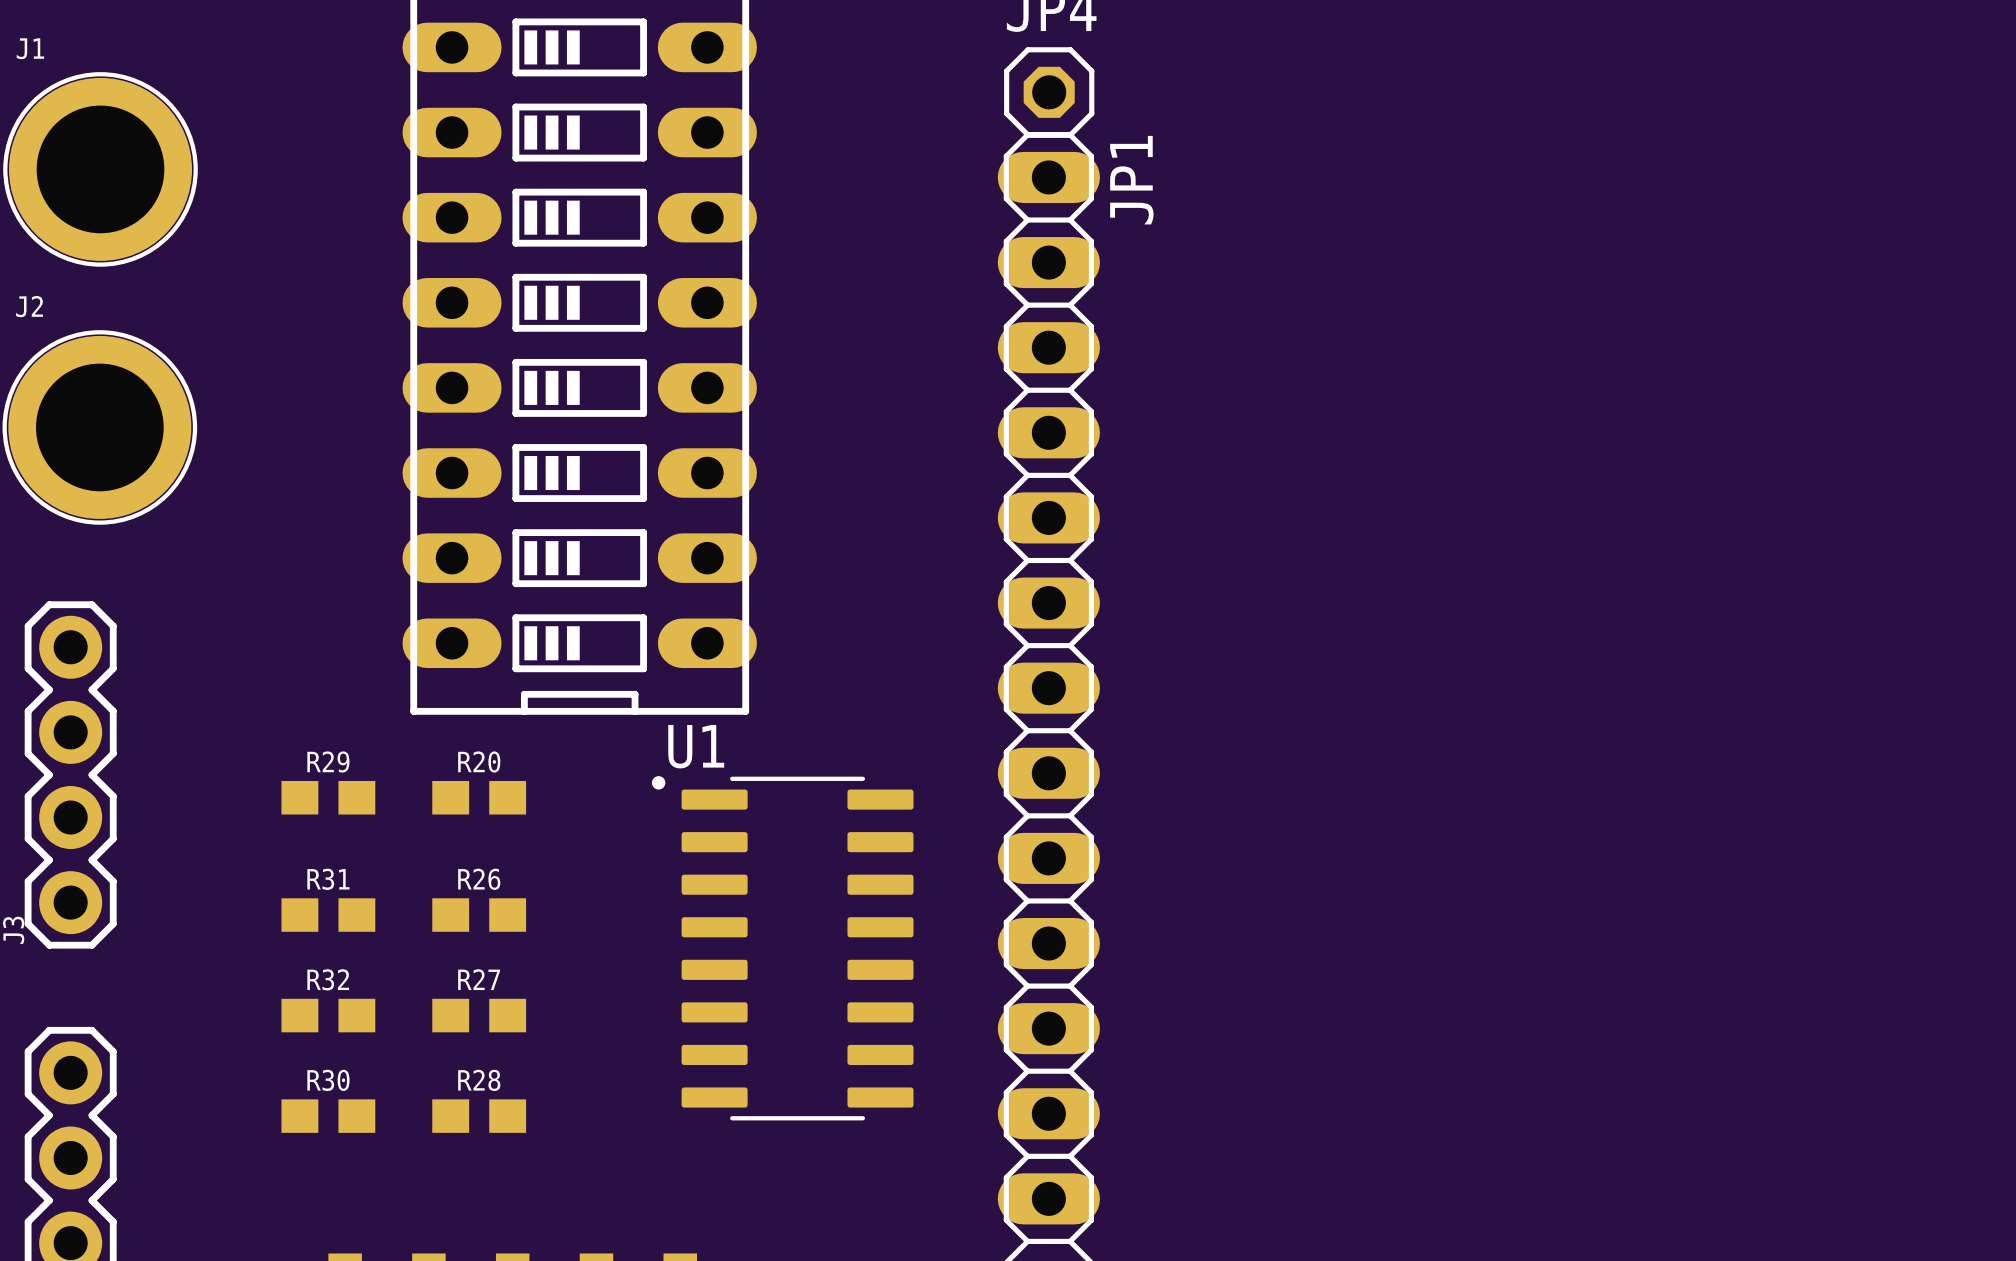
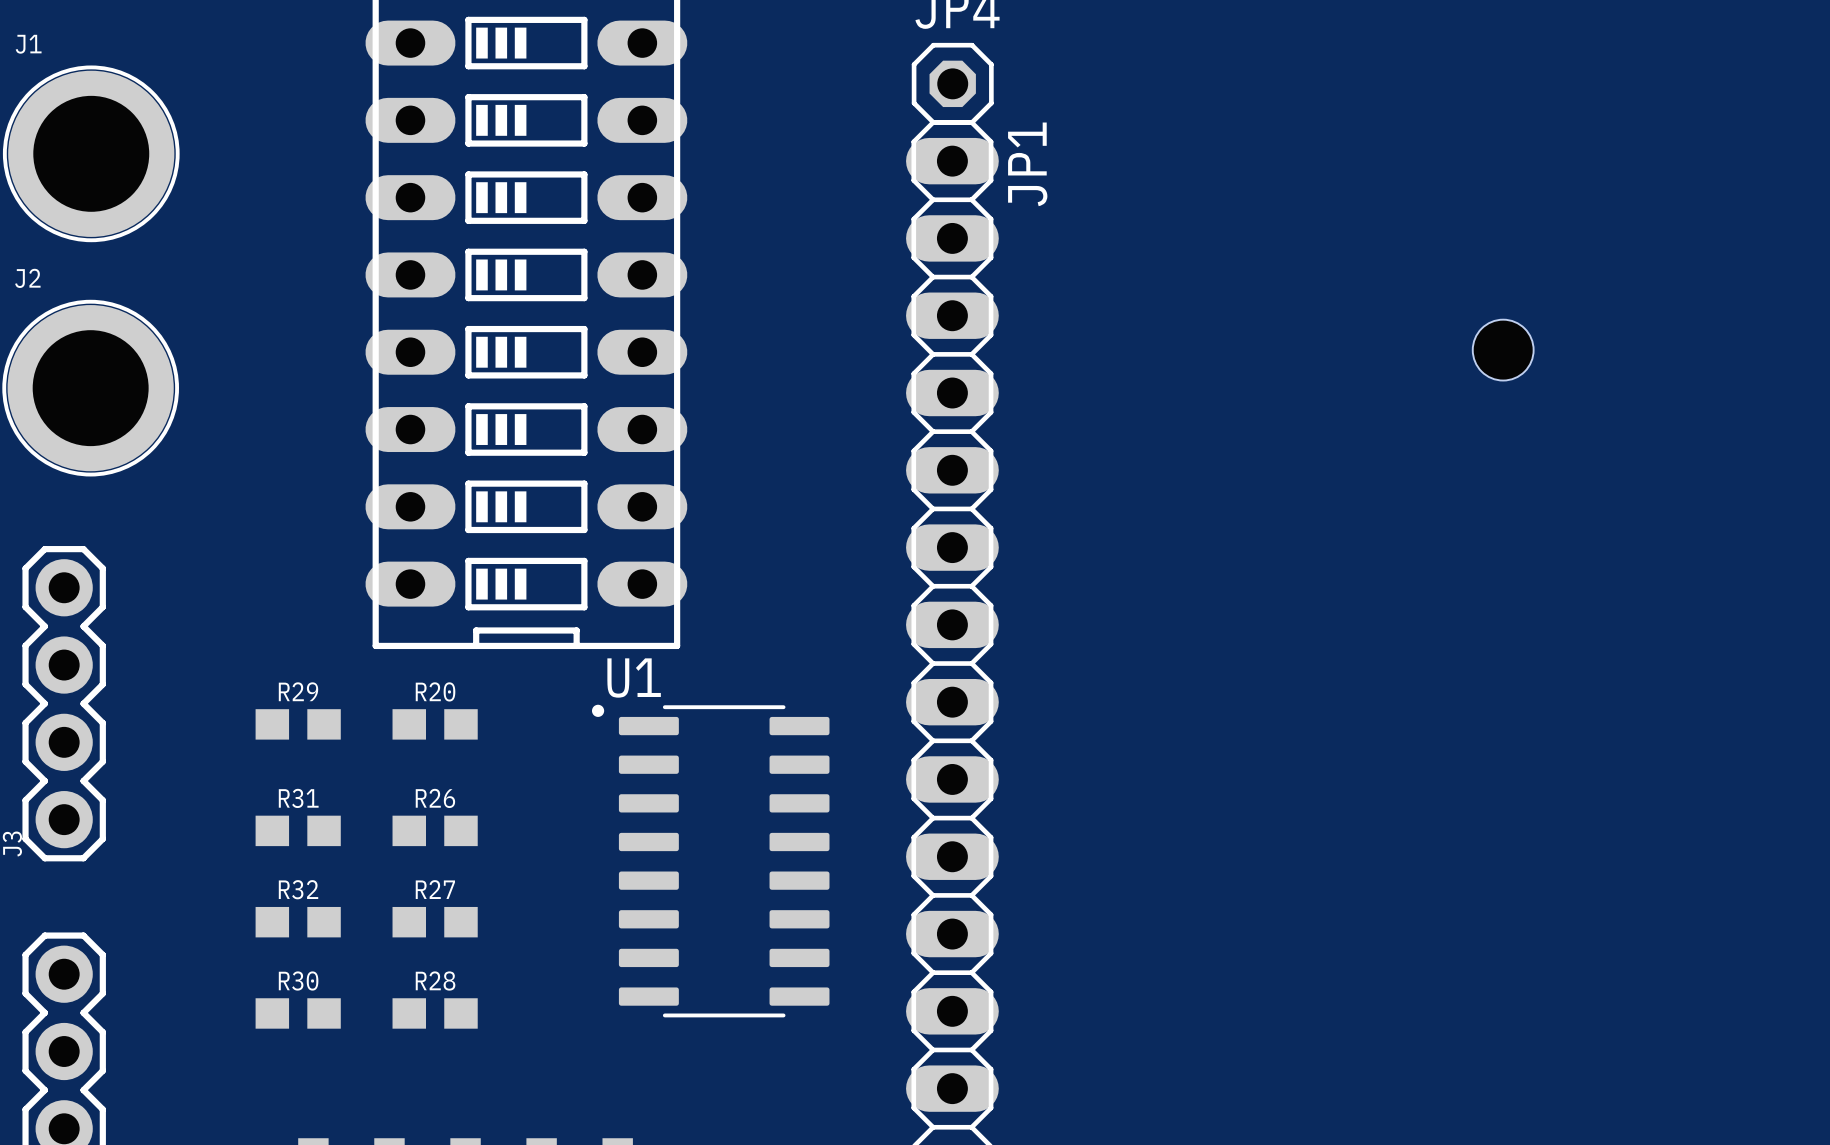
hole: none -> (1503, 350)

